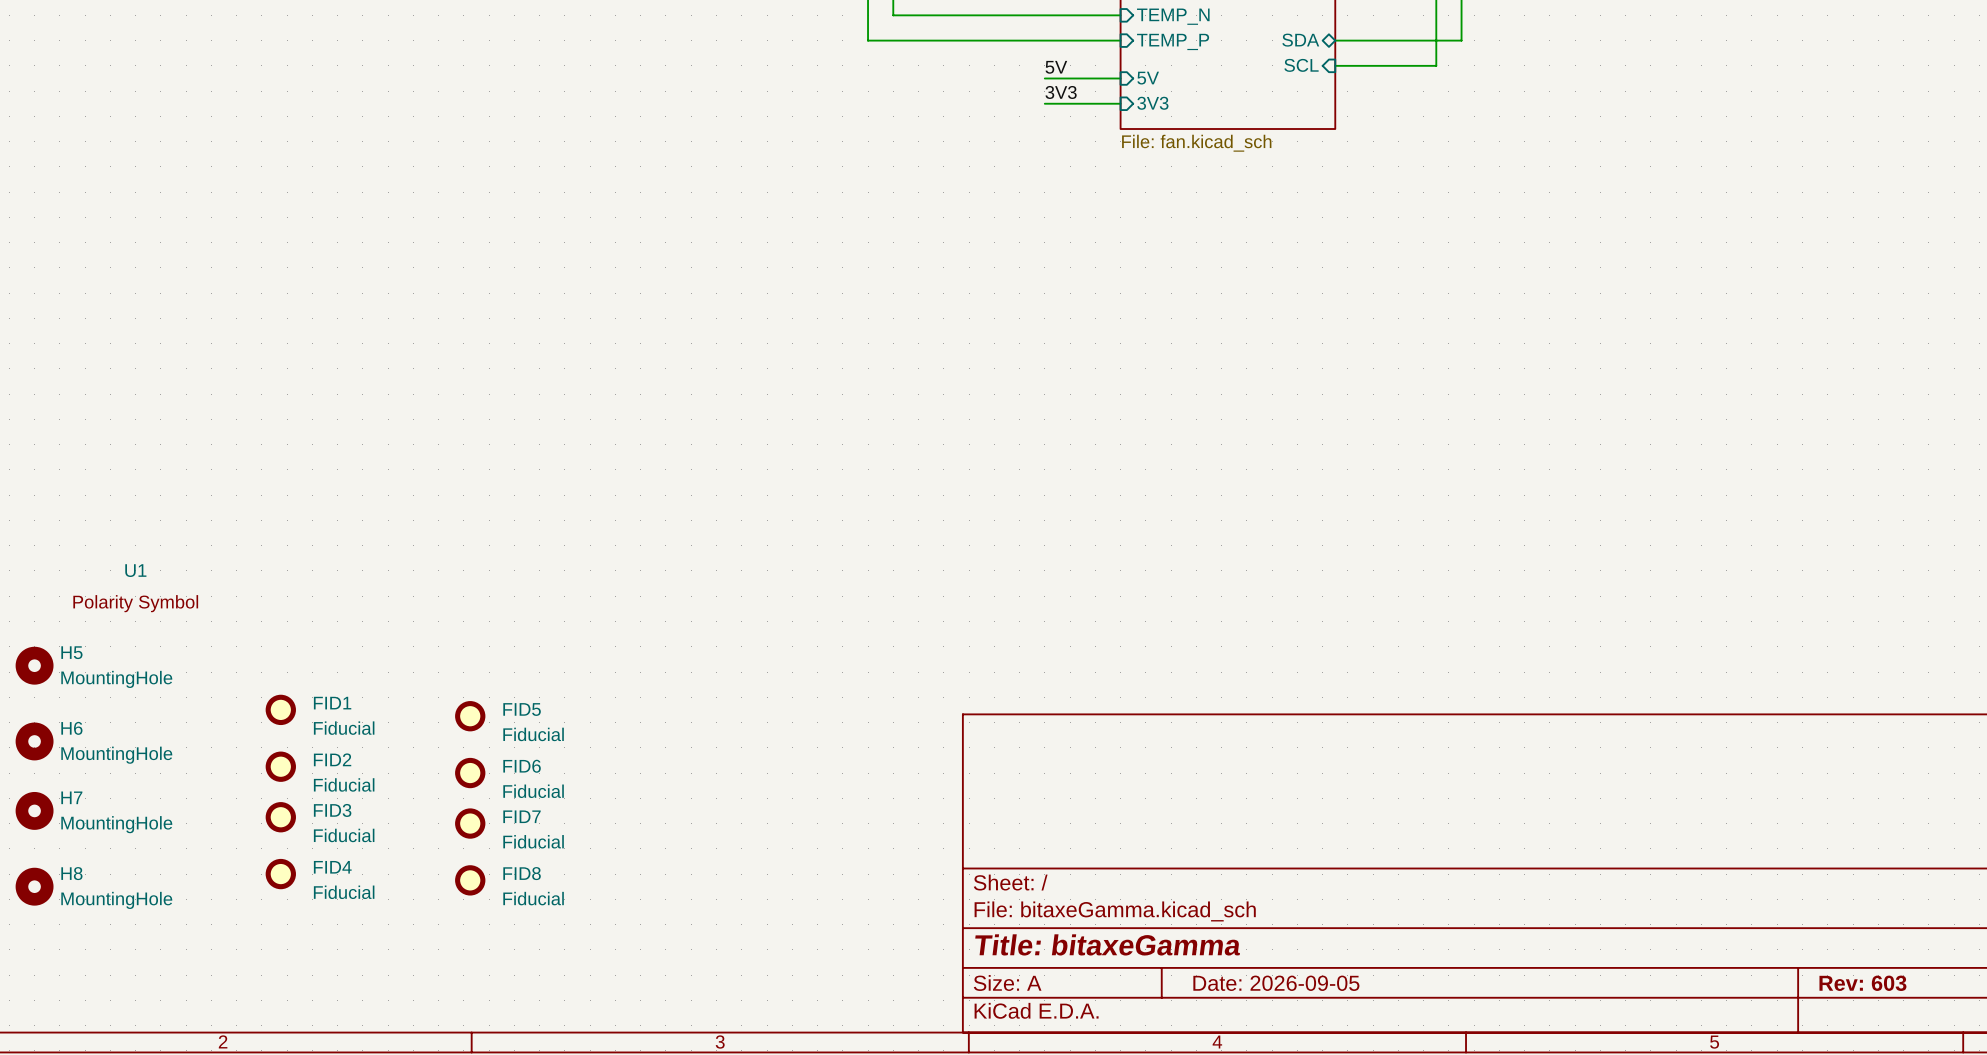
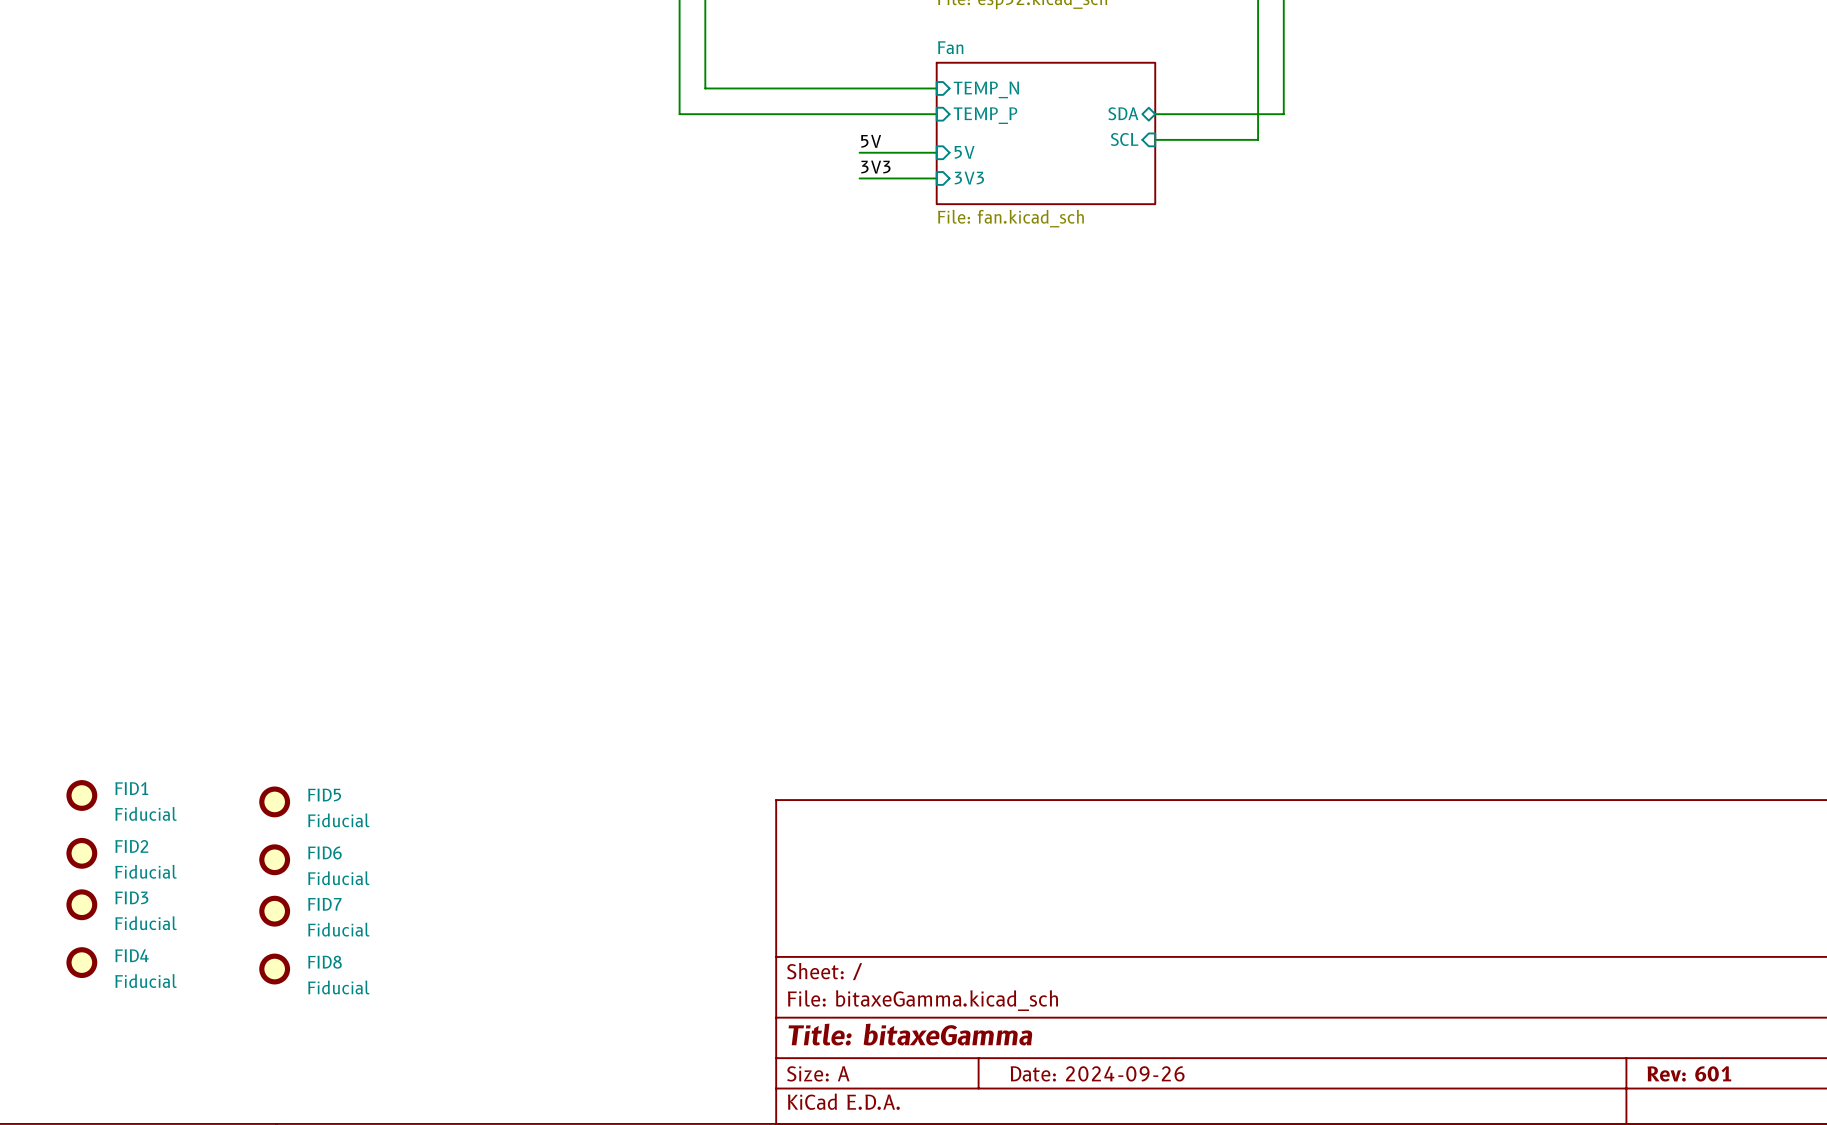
title block: Date: 2026-09-05 (1276, 983) -> Date: 2024-09-26 (1097, 1073)
title block: Rev: 603 (1862, 983) -> Rev: 601 (1689, 1073)

